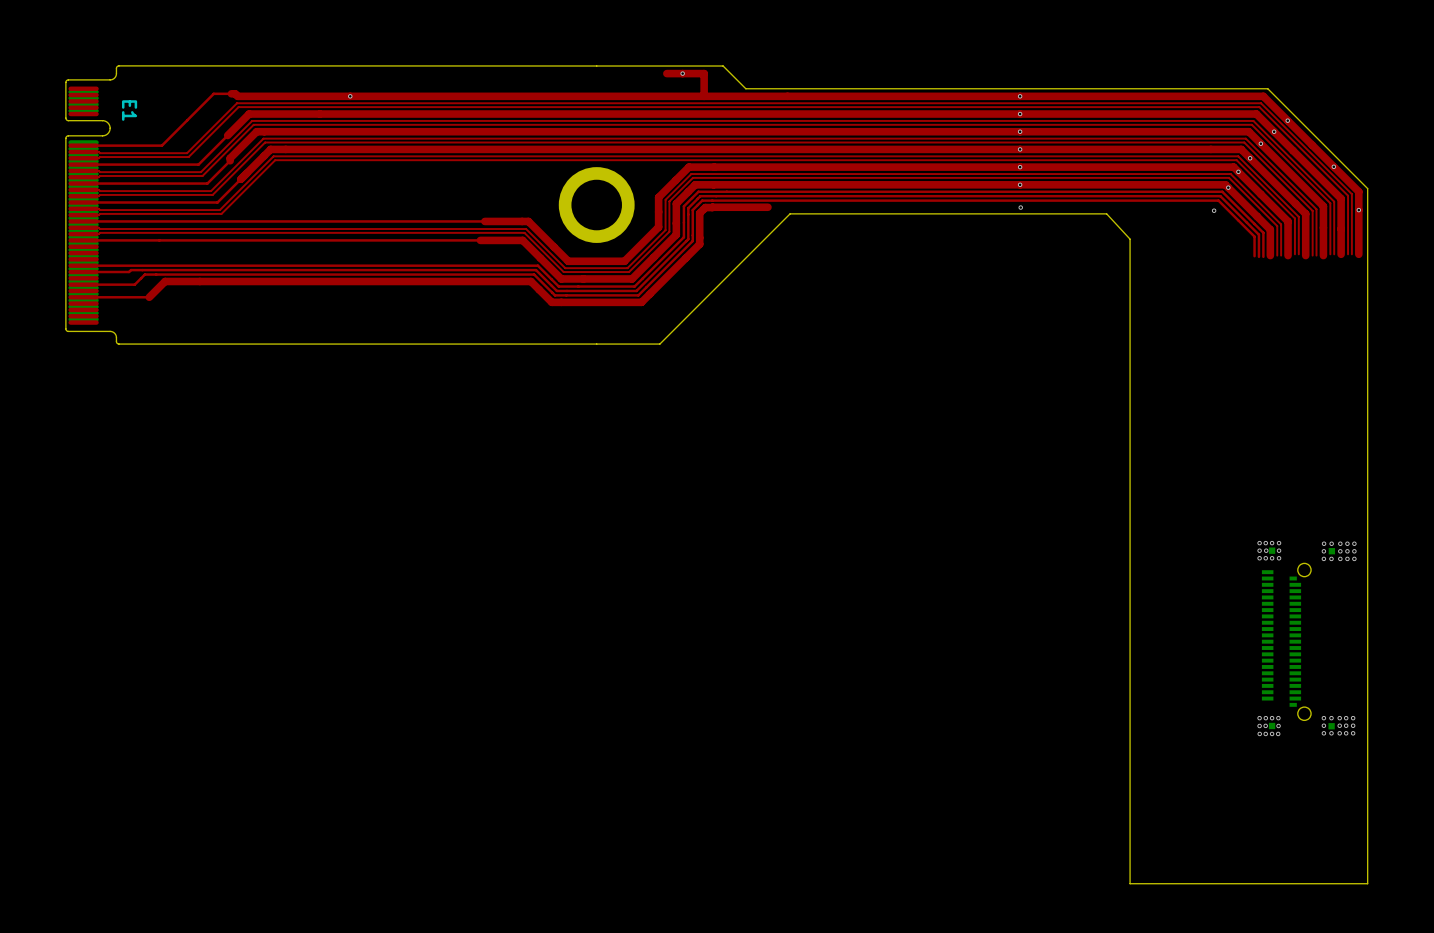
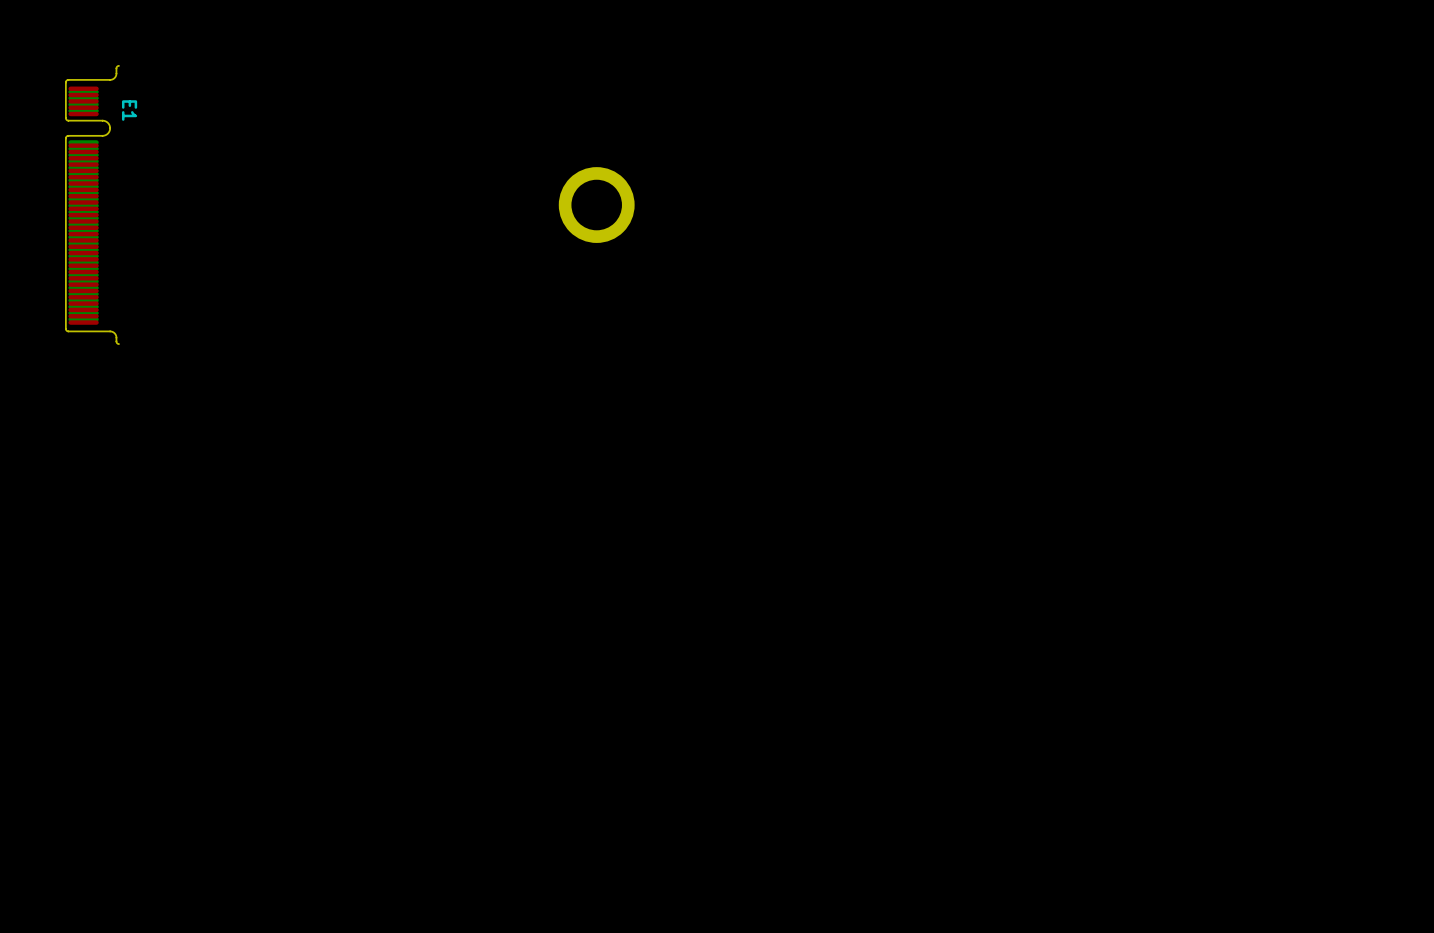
board edge: (118, 65) (723, 66) (745, 88) (1267, 88) (1367, 188) (1367, 883) (1130, 883) (1130, 239) (1106, 213) (790, 213) (659, 344) (118, 344) -> none
top track: (666, 73) (704, 73) (704, 96) -> none
via: (682, 73) -> none
via: (350, 96) -> none
via: (1020, 96) -> none
via: (1020, 114) -> none
via: (1287, 120) -> none
via: (1020, 131) -> none
via: (1274, 131) -> none
via: (1260, 143) -> none
top track: (83, 145) (161, 145) (213, 93) (235, 93) (237, 96) (1263, 96) (1358, 191) (1358, 254) -> none
via: (1020, 149) -> none
top track: (83, 152) (187, 153) (236, 103) (1261, 103) (1351, 194) (1351, 254) -> none
top track: (83, 158) (188, 157) (238, 107) (1259, 107) (1348, 195) (1348, 254) -> none
via: (1250, 158) -> none
top track: (83, 164) (198, 164) (249, 114) (1256, 114) (1341, 198) (1341, 254) -> none
via: (1333, 166) -> none
via: (1020, 167) -> none
top track: (83, 170) (200, 172) (252, 120) (1253, 120) (1334, 201) (1334, 254) -> none
via: (1238, 171) -> none
top track: (246, 173) (217, 202) (83, 202) -> none
top track: (83, 177) (202, 175) (253, 124) (1251, 124) (1330, 203) (1330, 254) -> none
top track: (240, 179) (270, 149) (1241, 149) (1305, 213) (1305, 255) -> none
top track: (83, 183) (207, 183) (256, 131) (1248, 131) (1323, 206) (1323, 255) -> none
via: (1020, 184) -> none
via: (1228, 187) -> none
top track: (83, 189) (211, 191) (263, 138) (1245, 138) (1316, 209) (1316, 255) -> none
top track: (83, 196) (212, 194) (265, 142) (1244, 142) (1312, 210) (1312, 255) -> none
top track: (767, 207) (705, 207) (699, 213) (699, 244) (641, 302) (551, 302) (530, 281) (165, 281) (149, 297) (83, 297) -> none
via: (1020, 207) -> none
top track: (83, 208) (219, 210) (273, 156) (1238, 156) (1298, 216) (1298, 254) -> none
via: (1214, 210) -> none
via: (1358, 210) -> none
top track: (83, 215) (221, 213) (275, 160) (1236, 160) (1294, 218) (1294, 254) -> none
top track: (83, 221) (528, 221) (568, 261) (624, 261) (658, 227) (658, 197) (688, 167) (1233, 167) (1288, 221) (1288, 255) -> none
top track: (83, 227) (526, 229) (565, 268) (627, 268) (665, 230) (665, 199) (691, 174) (1230, 174) (1281, 224) (1281, 255) -> none
top track: (83, 234) (524, 232) (563, 272) (629, 272) (669, 231) (669, 201) (692, 177) (1229, 177) (1277, 226) (1277, 255) -> none
top track: (83, 240) (522, 240) (561, 278) (632, 278) (676, 234) (676, 203) (695, 184) (1225, 184) (1270, 229) (1270, 255) -> none
top track: (1254, 256) (1254, 236) (1218, 200) (702, 200) (692, 210) (692, 241) (638, 295) (555, 295) (534, 274) (144, 274) (134, 284) (83, 284) -> none
top track: (1258, 256) (1258, 234) (1220, 196) (700, 196) (688, 208) (688, 239) (636, 290) (556, 290) (536, 270) (130, 270) (129, 272) (83, 272) -> none
top track: (1263, 256) (1263, 232) (1222, 191) (698, 191) (683, 206) (683, 237) (634, 286) (558, 286) (537, 265) (83, 265) -> none
via: (1259, 543) -> none
via: (1265, 543) -> none
via: (1272, 543) -> none
via: (1279, 543) -> none
via: (1324, 543) -> none
via: (1331, 543) -> none
via: (1340, 543) -> none
via: (1347, 543) -> none
via: (1354, 543) -> none
via: (1259, 550) -> none
via: (1266, 550) -> none
via: (1279, 550) -> none
via: (1323, 551) -> none
via: (1340, 551) -> none
via: (1347, 551) -> none
via: (1354, 551) -> none
via: (1259, 558) -> none
via: (1265, 558) -> none
via: (1272, 558) -> none
via: (1279, 558) -> none
via: (1323, 558) -> none
via: (1331, 558) -> none
via: (1340, 558) -> none
via: (1347, 558) -> none
via: (1354, 558) -> none
part: (1298, 638) -> none
via: (1259, 718) -> none
via: (1265, 718) -> none
via: (1272, 718) -> none
via: (1278, 718) -> none
via: (1323, 718) -> none
via: (1331, 718) -> none
via: (1339, 718) -> none
via: (1346, 718) -> none
via: (1353, 718) -> none
via: (1259, 725) -> none
via: (1265, 725) -> none
via: (1278, 725) -> none
via: (1323, 725) -> none
via: (1339, 725) -> none
via: (1346, 725) -> none
via: (1353, 725) -> none
via: (1259, 733) -> none
via: (1265, 733) -> none
via: (1272, 733) -> none
via: (1278, 733) -> none
via: (1323, 733) -> none
via: (1331, 733) -> none
via: (1339, 733) -> none
via: (1346, 733) -> none
via: (1353, 733) -> none

